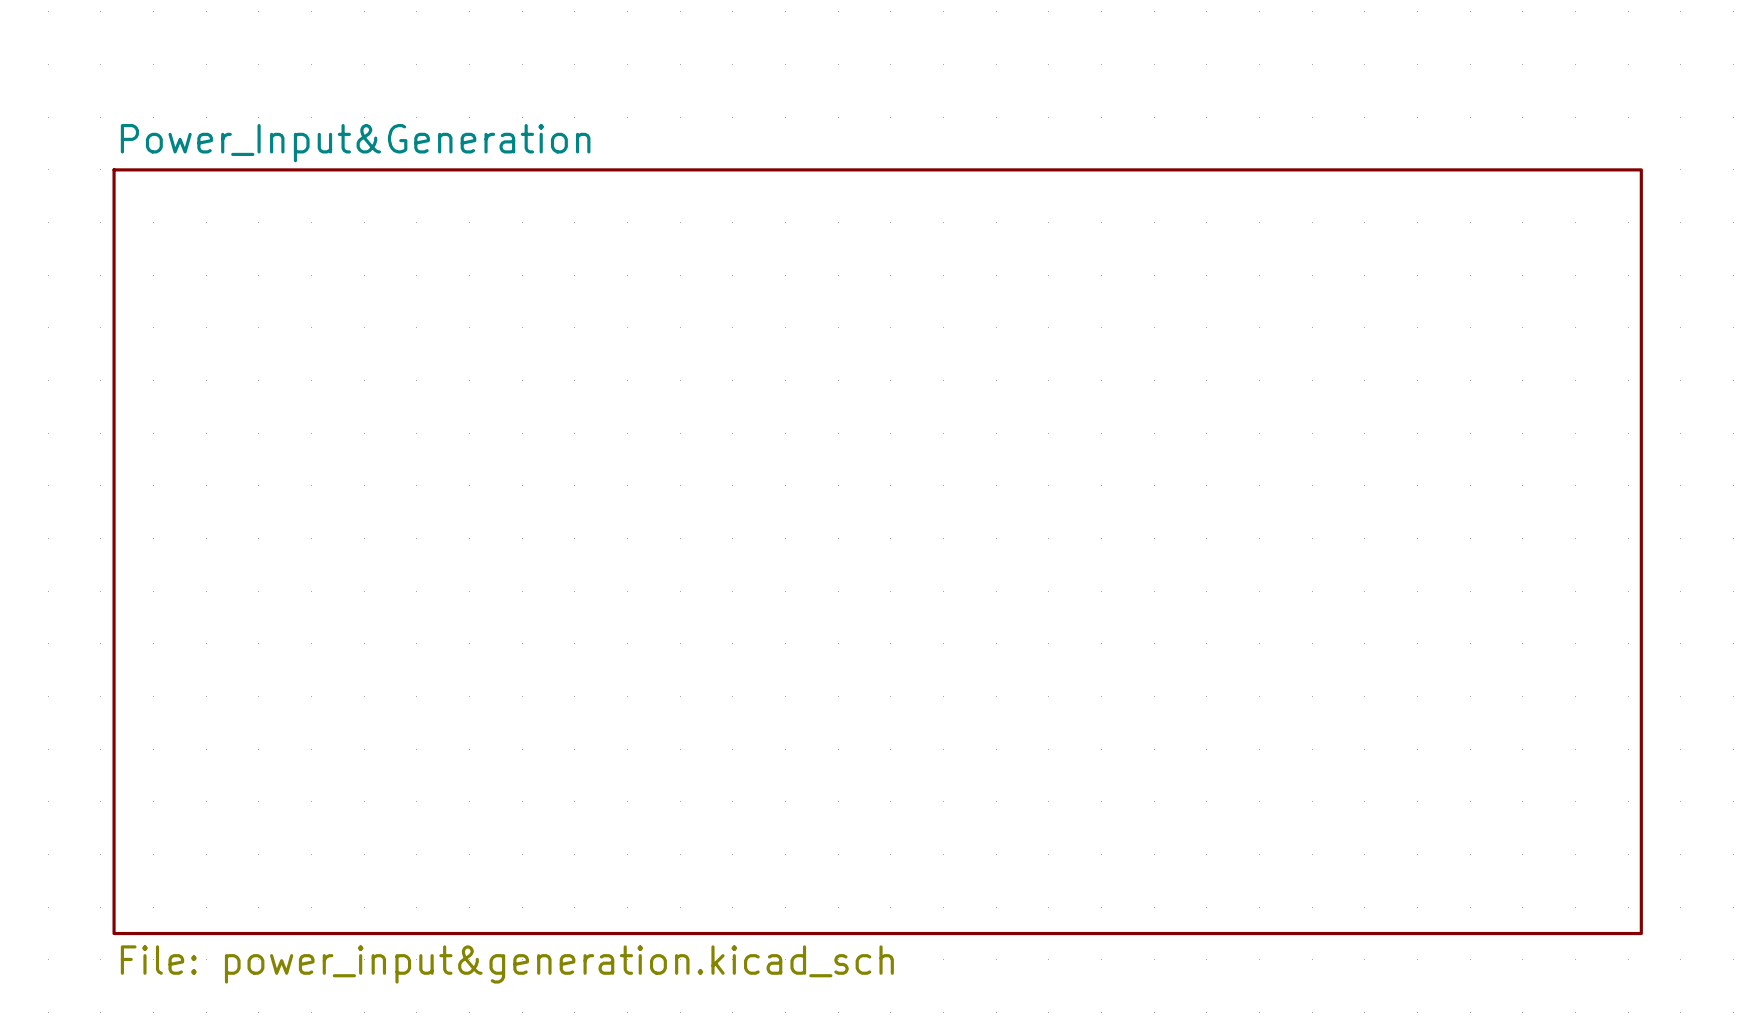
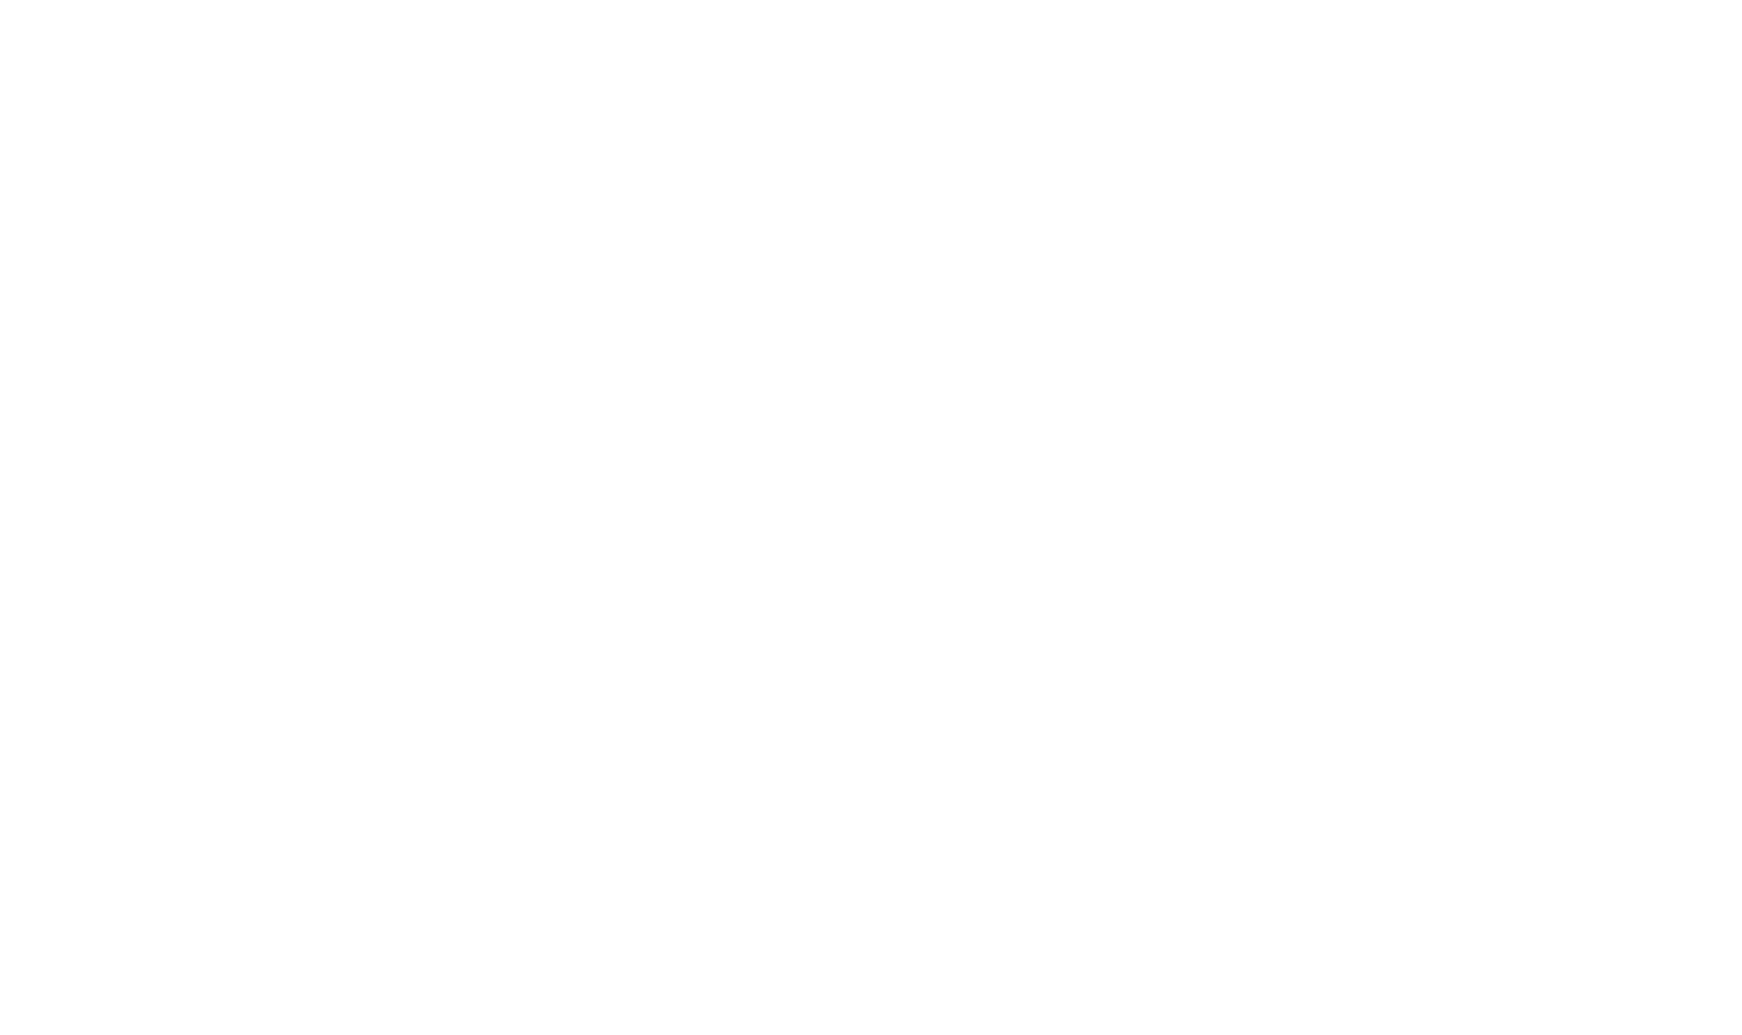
sheet Power_Input&Generation: File: power_input&generation.kicad_sch (877, 551) -> none

